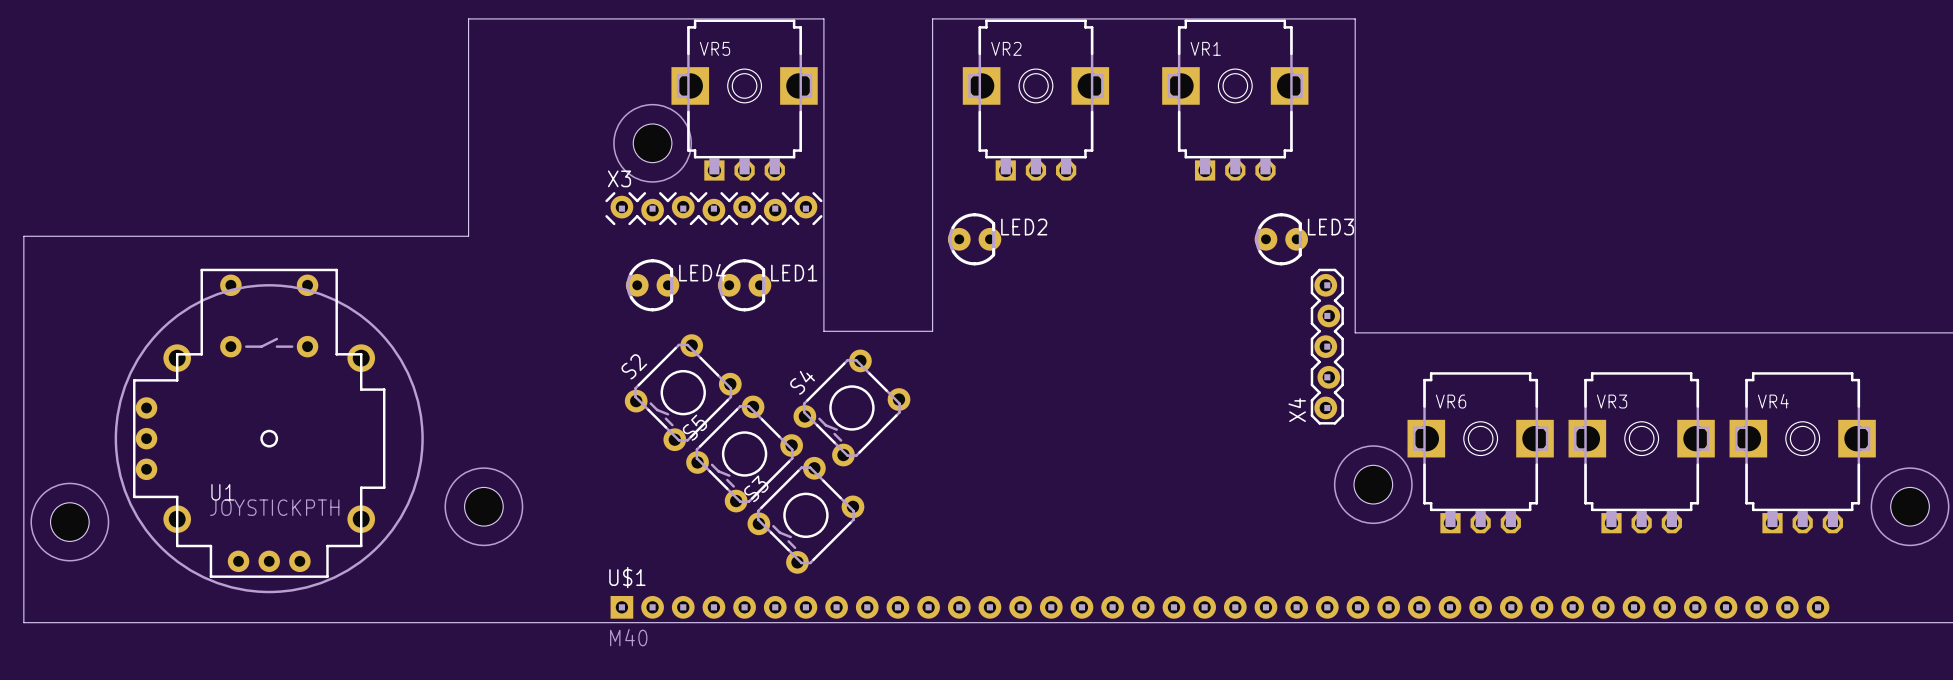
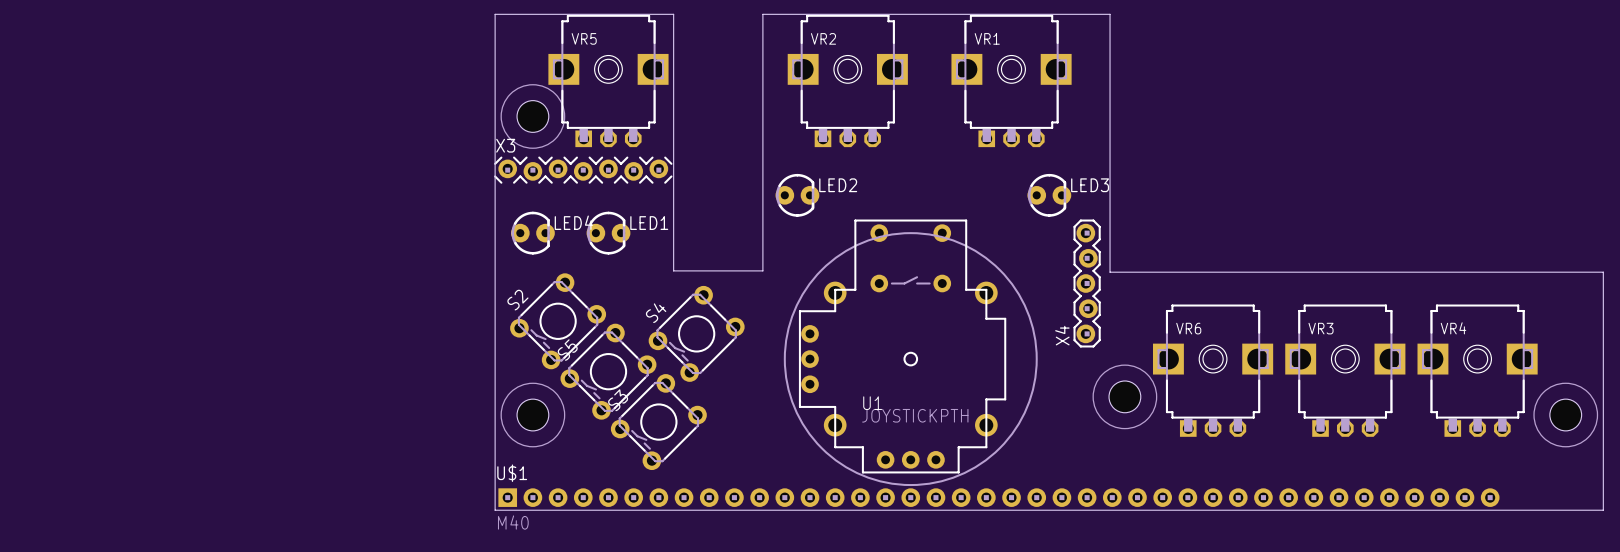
board edge: (606, 18) (468, 18) (468, 236) (23, 236) (23, 622) (606, 622) -> (495, 14) (495, 510)
U1 position: (269, 430) -> (910, 352)
part position: (483, 506) -> (532, 415)
part: (69, 522) -> none

